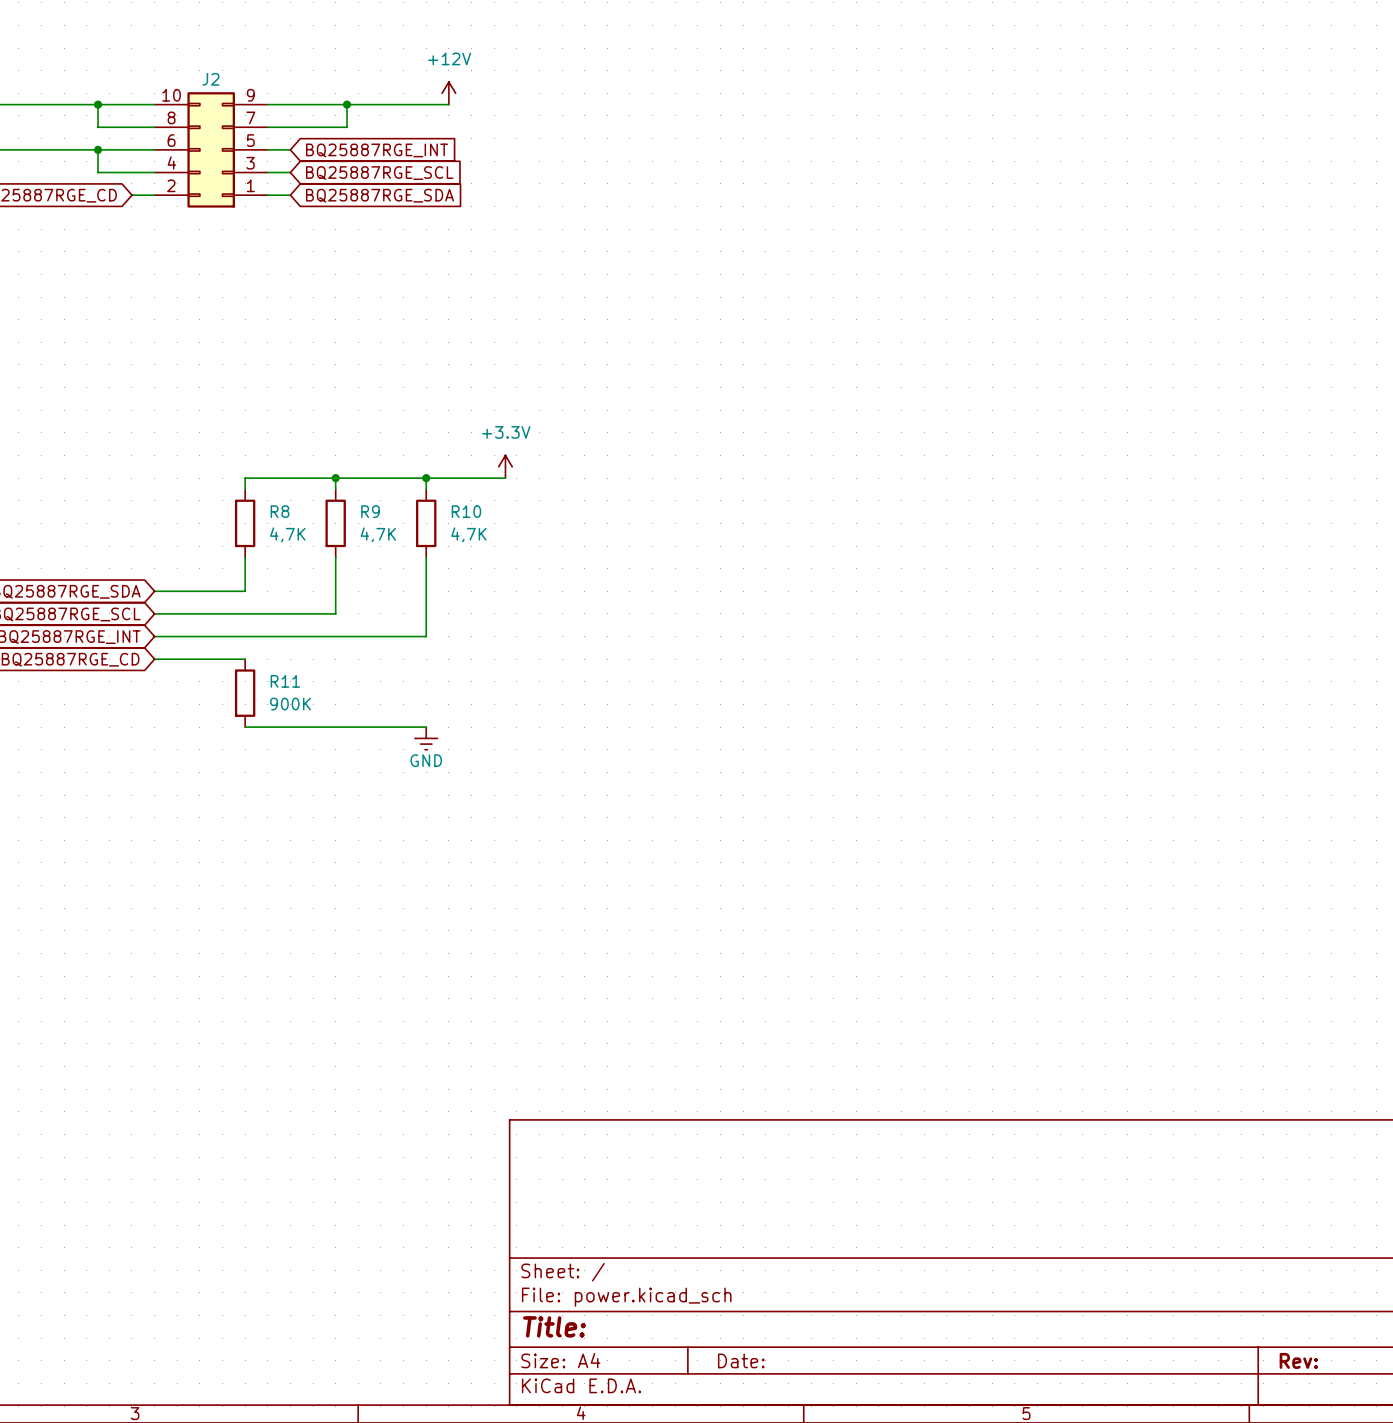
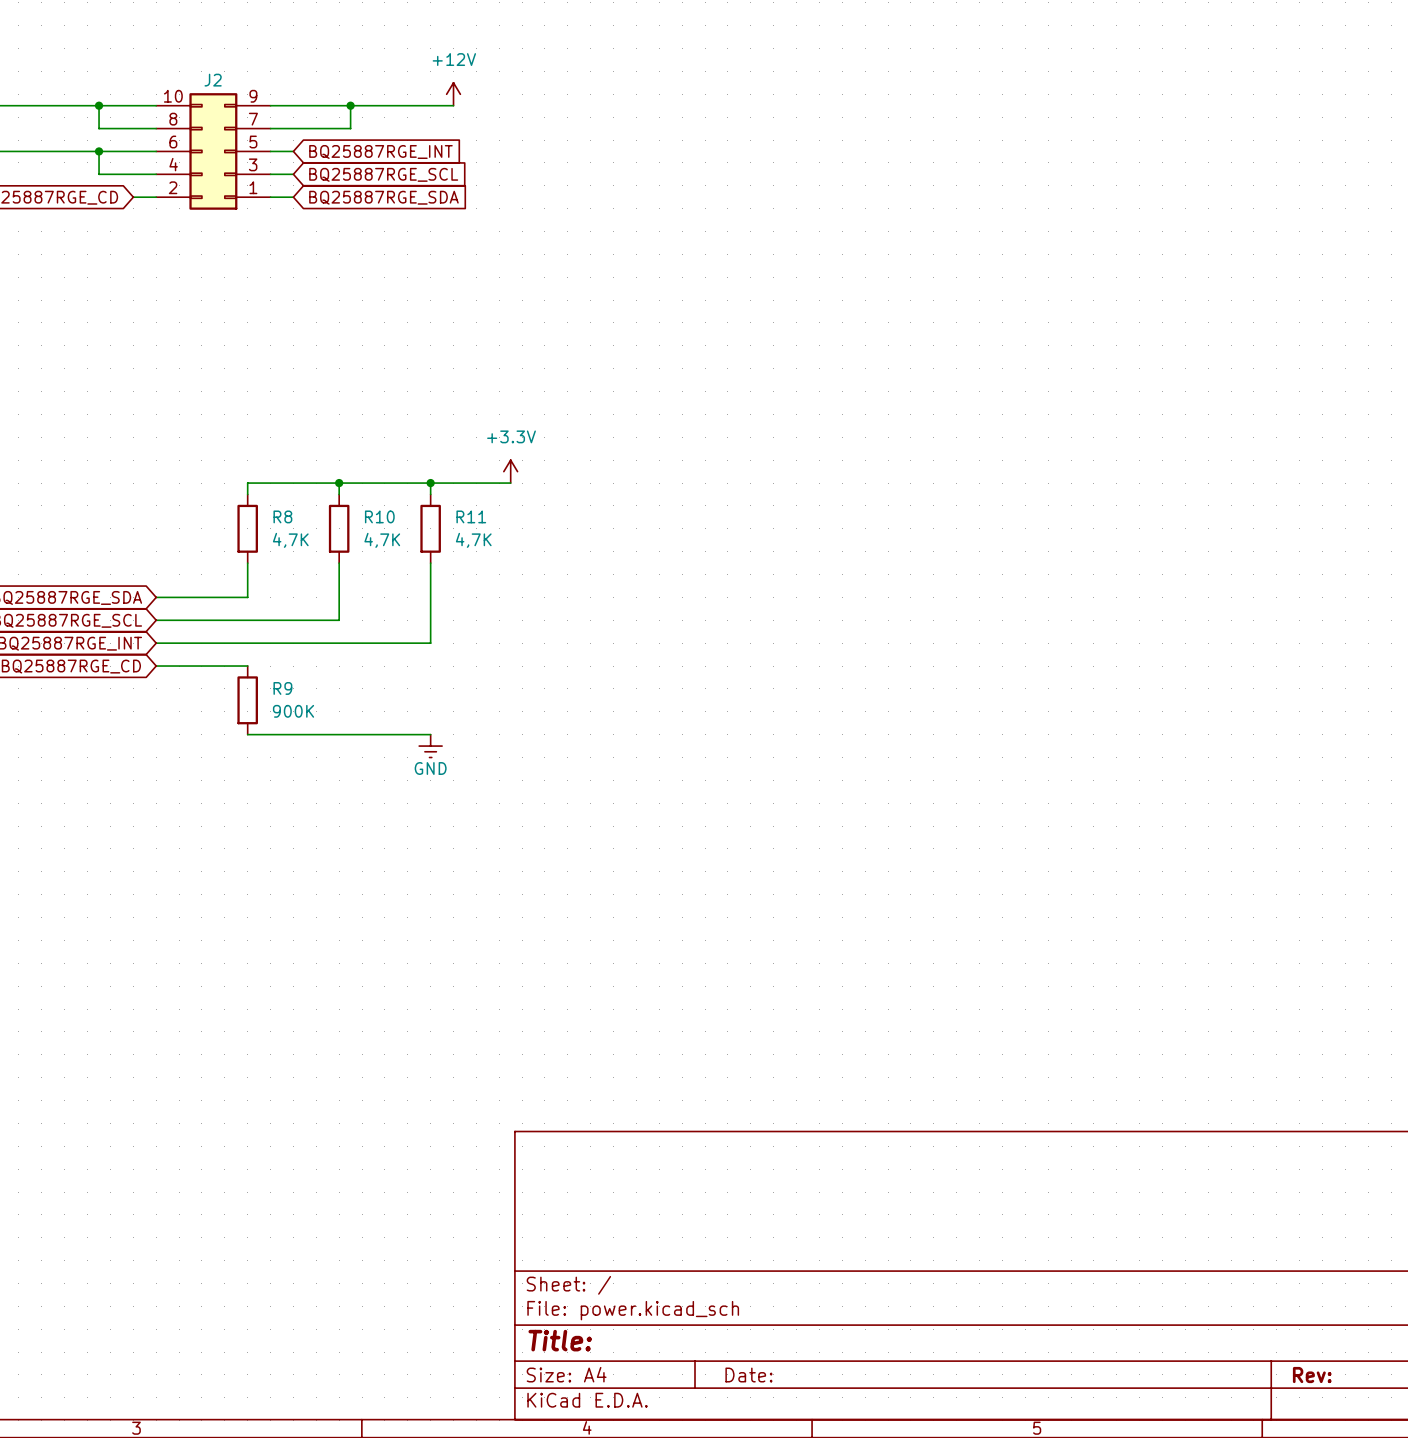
R9 name: R9 (370, 511) -> R10 (379, 516)
R10 name: R10 (466, 511) -> R11 (471, 516)
R11 name: R11 (285, 681) -> R9 (282, 688)

